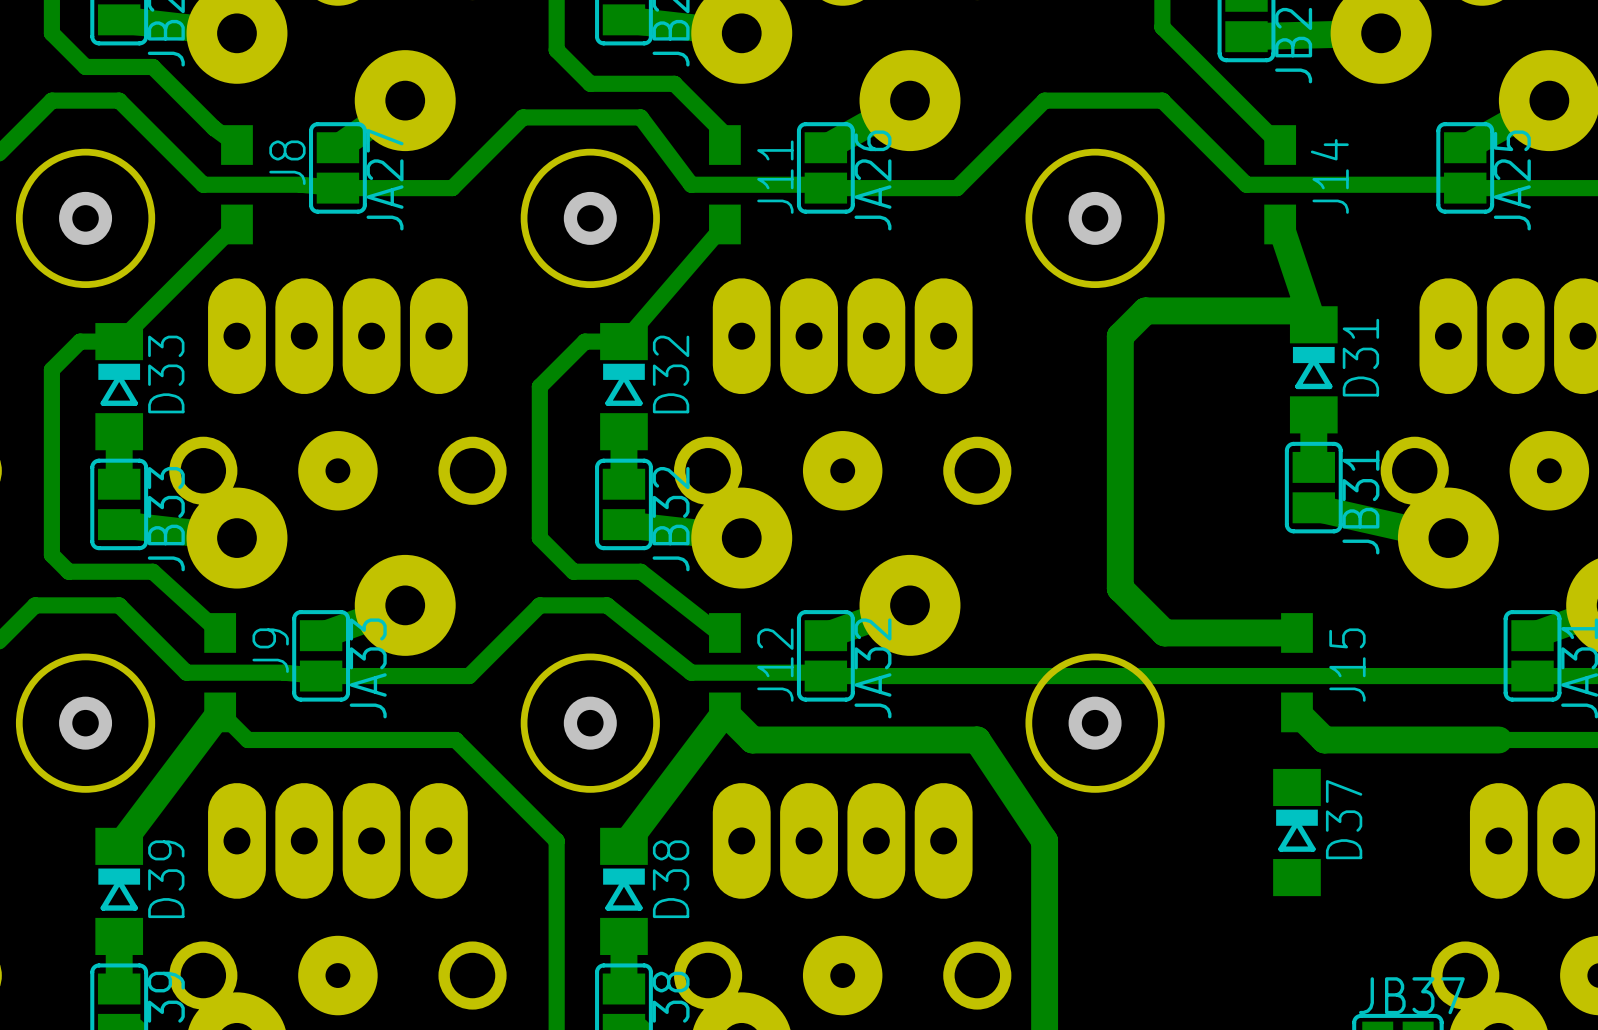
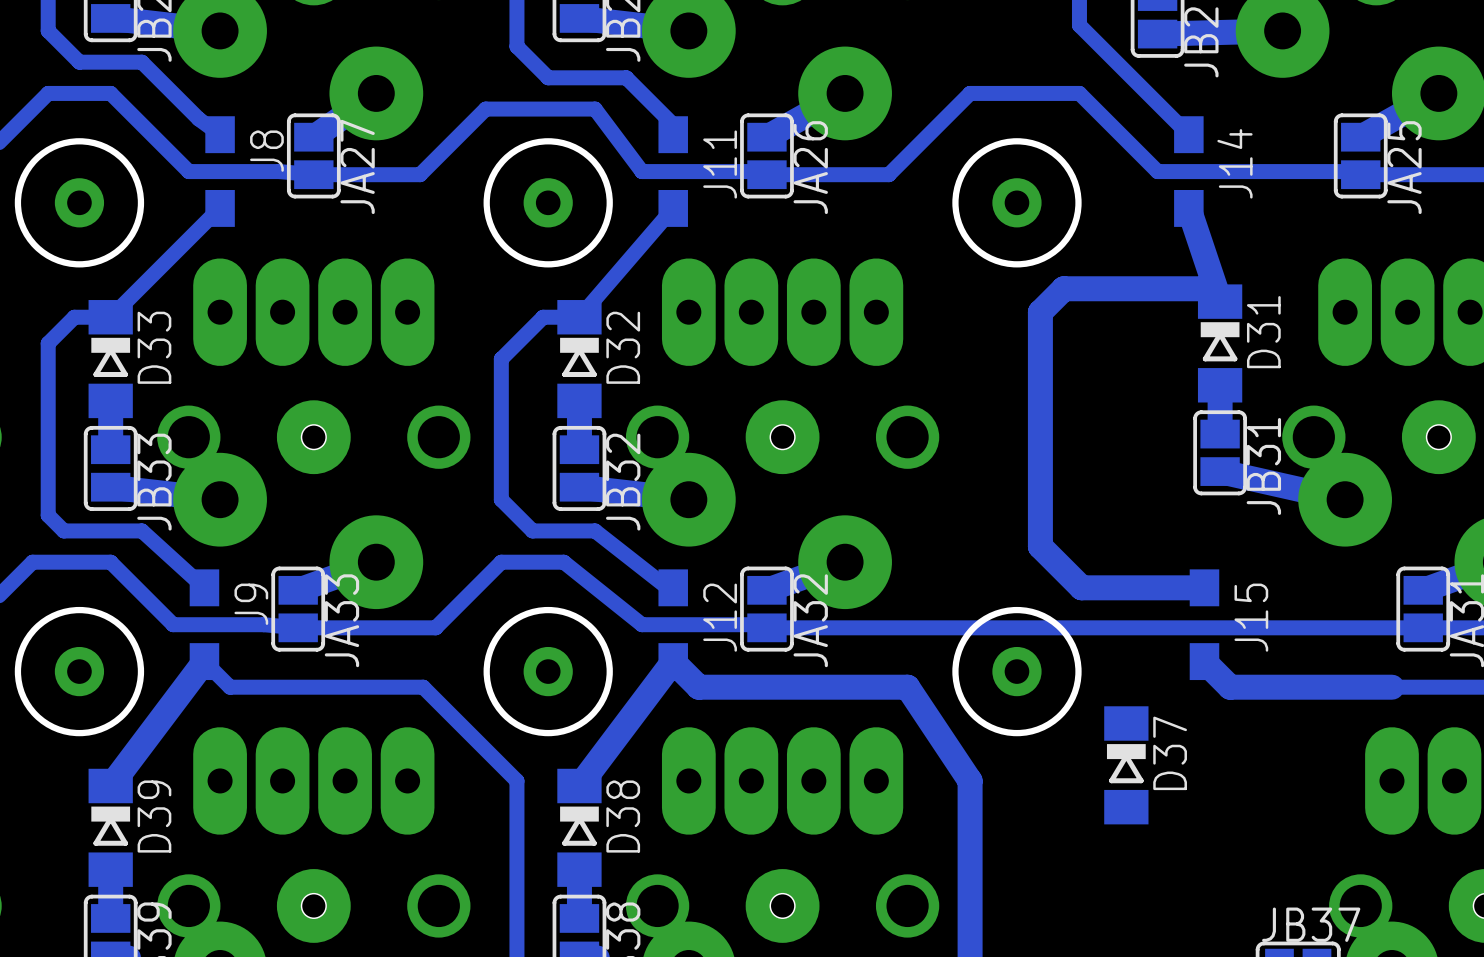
D37 position: (1296, 832) -> (1126, 765)

